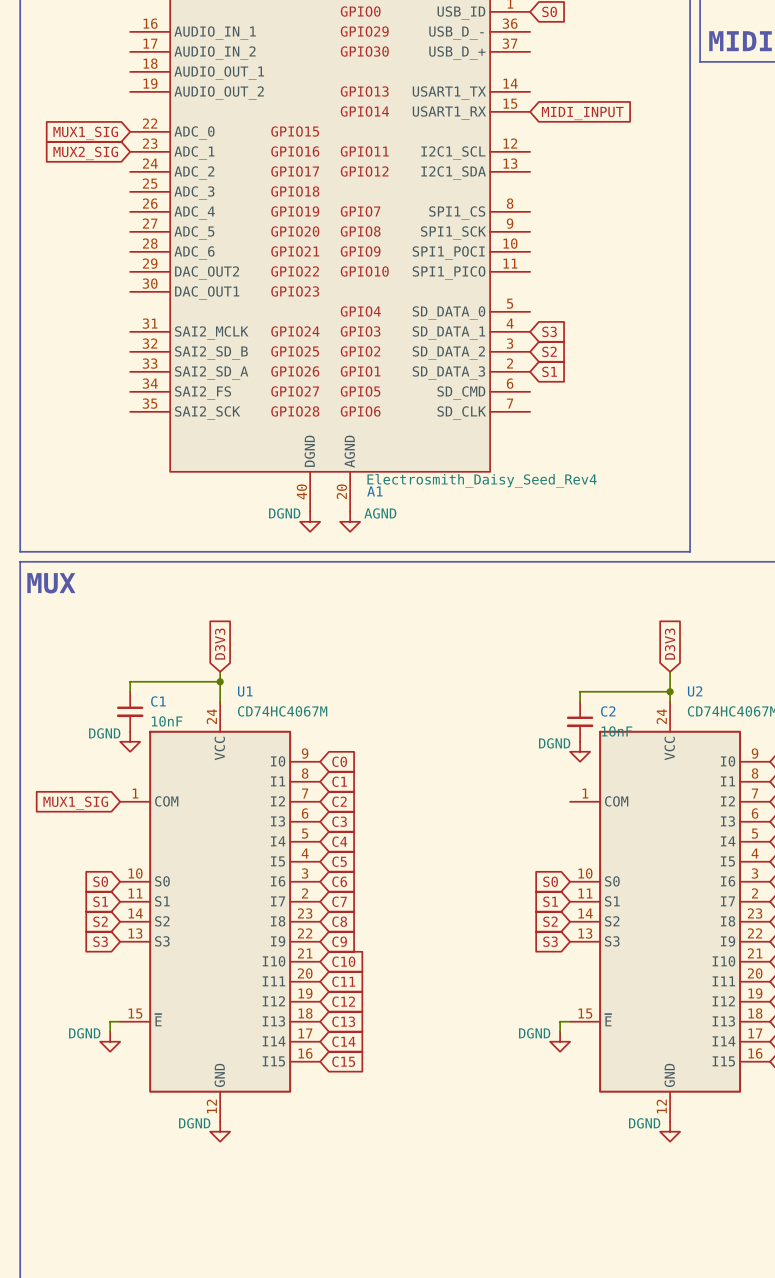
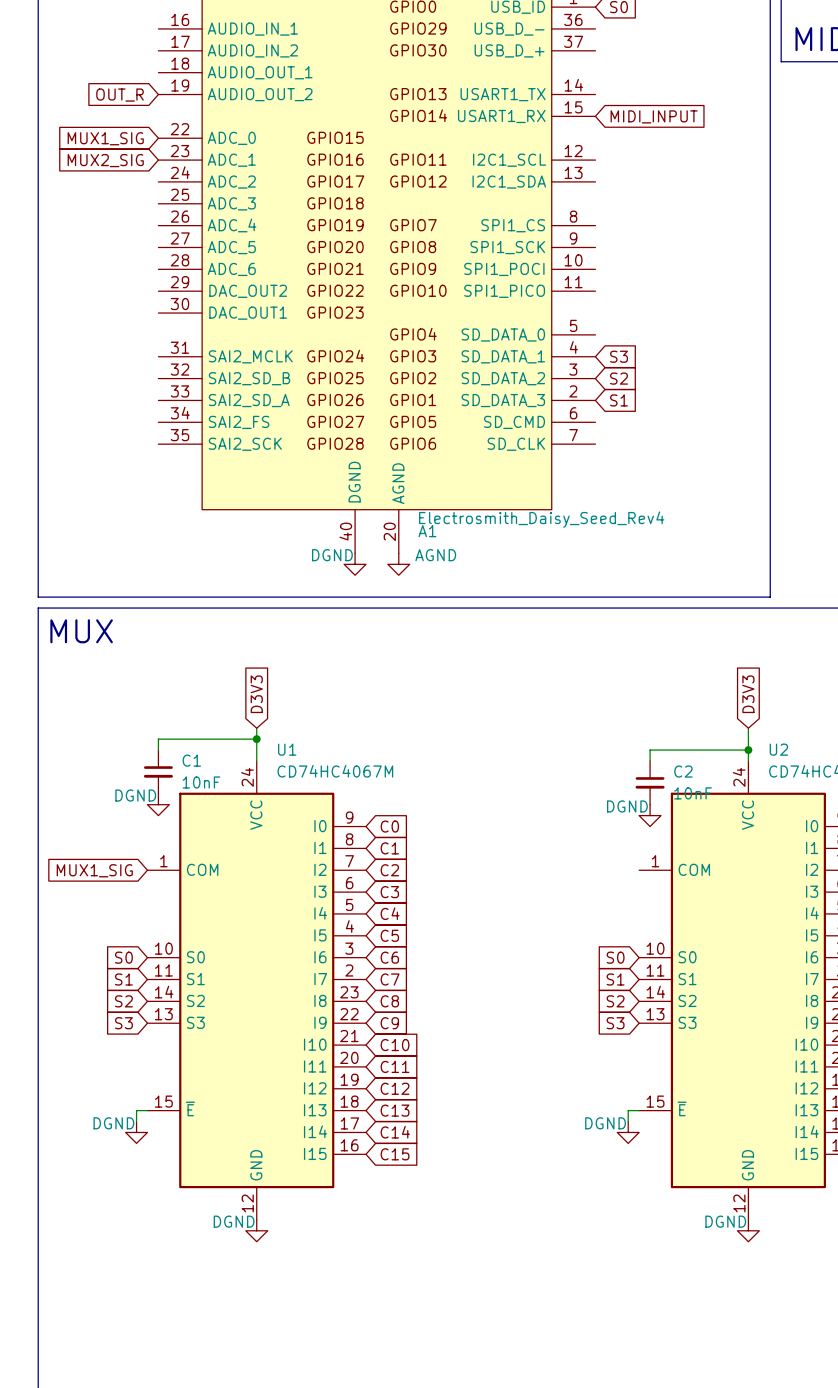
global label: none -> OUT_R (120, 95)

